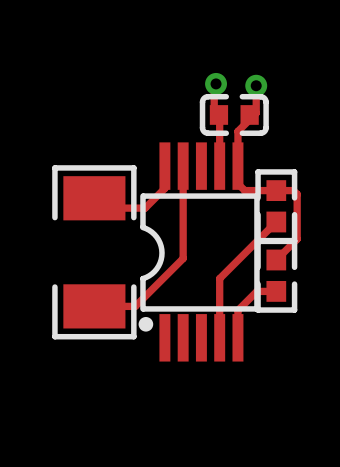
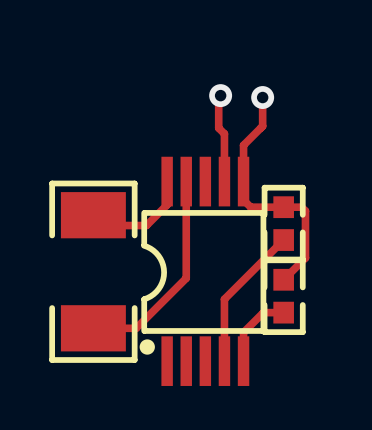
part: (234, 114) -> none

